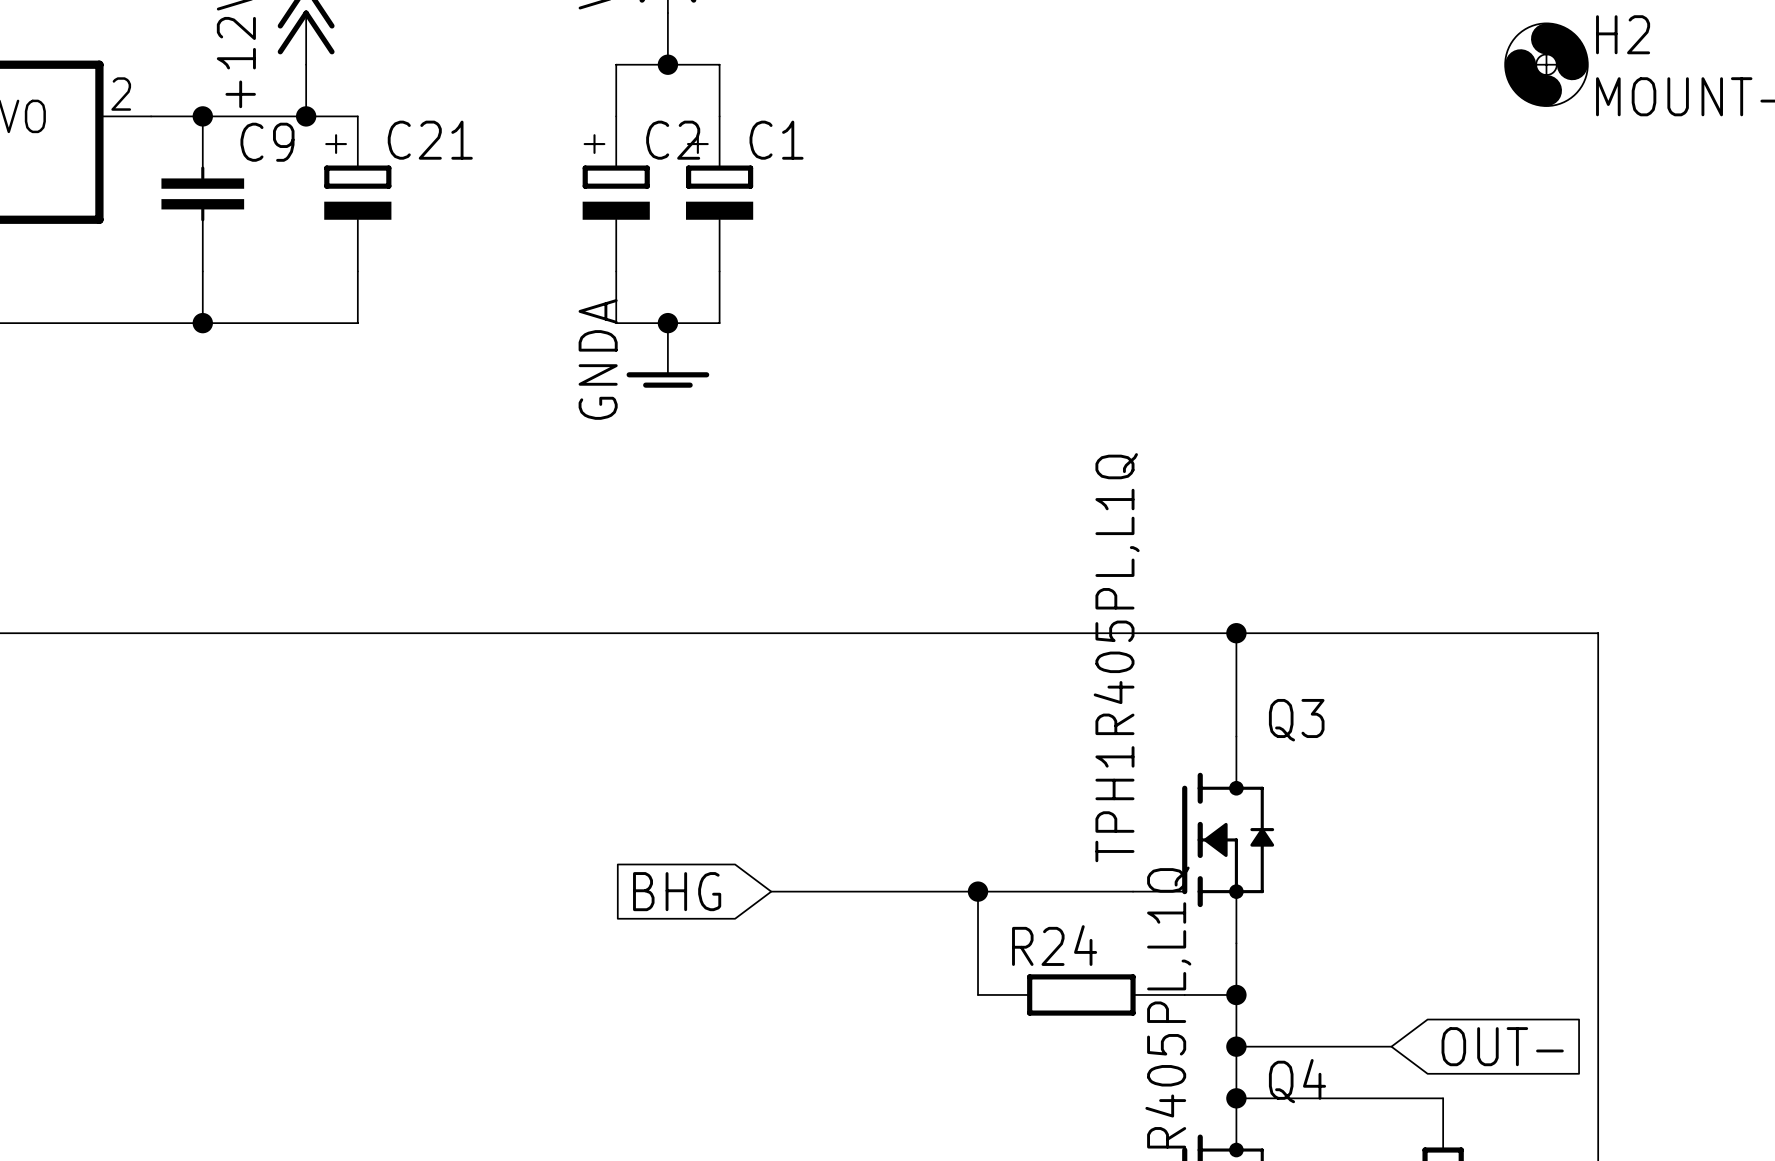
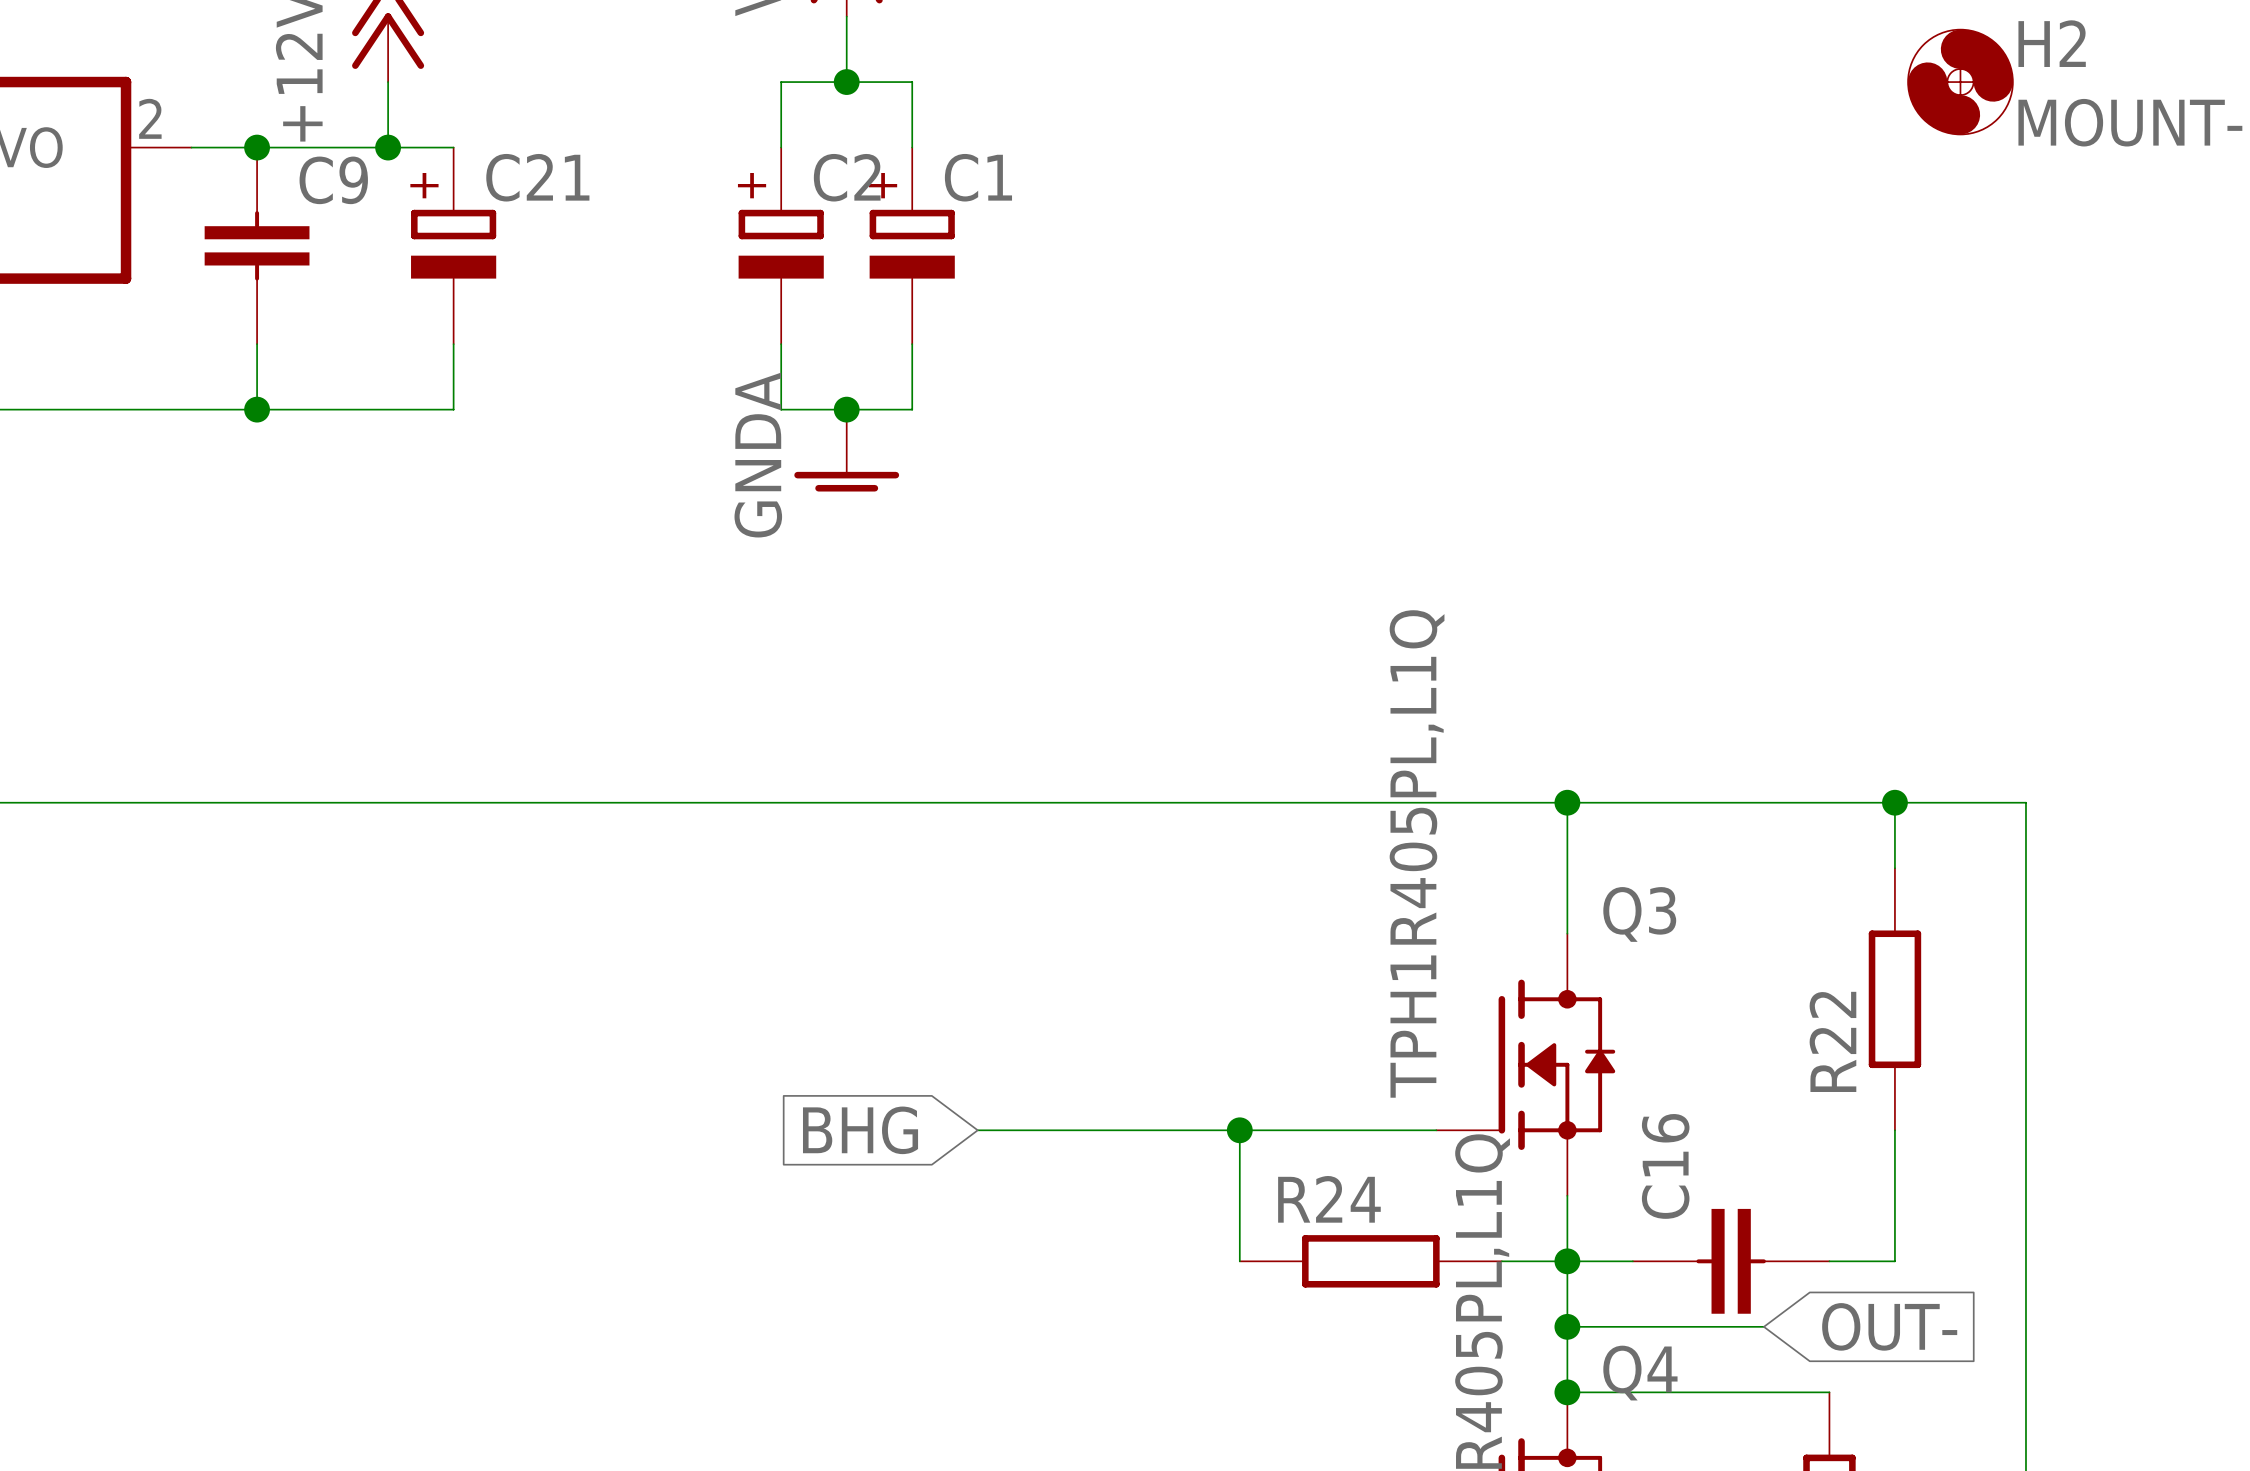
wire: none -> (1894, 802) (1894, 868)
junction: none -> (1894, 802)
R22: none -> (1894, 999)
wire: none -> (1894, 1130) (1894, 1261) (1829, 1261)
wire: none -> (1567, 1261) (1632, 1261)
C16: none -> (1731, 1261)

